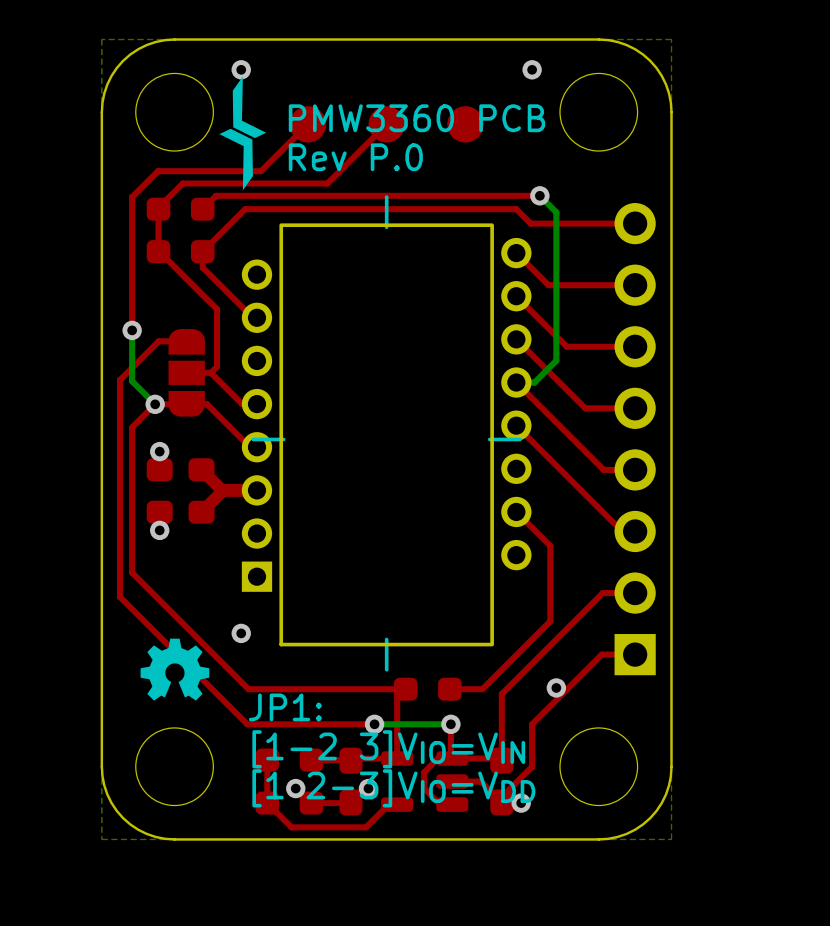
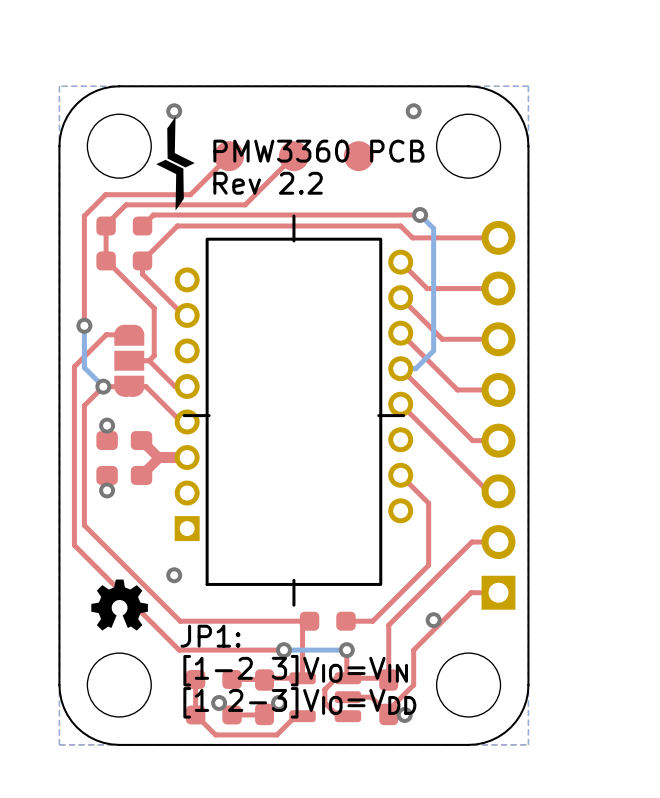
text: Rev P.0 (355, 157) -> Rev 2.2 (268, 183)

